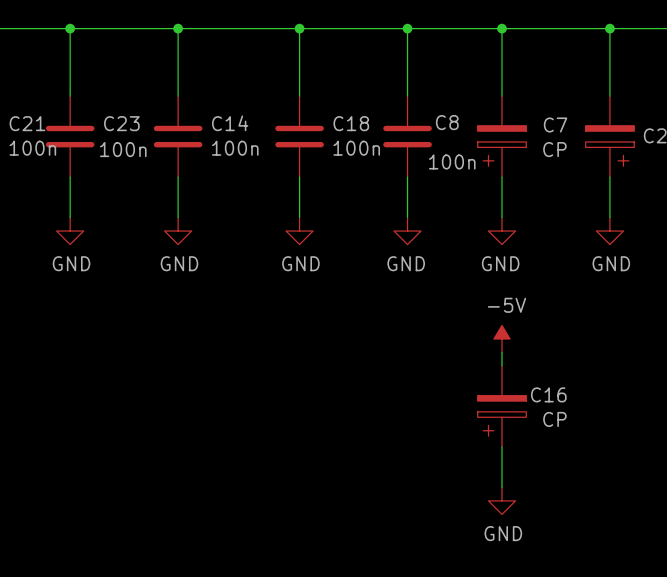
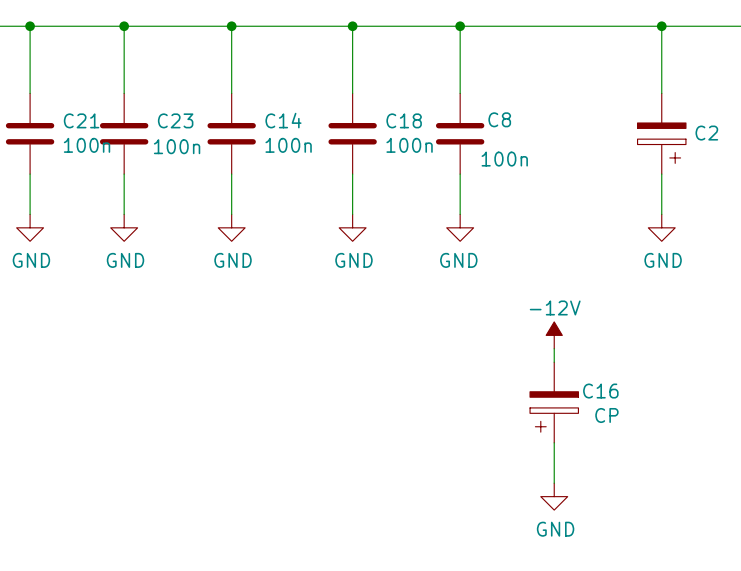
wire: (501, 28) (501, 96) -> none
junction: (501, 28) -> none
C7: CP (501, 136) -> none
wire: (501, 177) (501, 217) -> none
power symbol: GND (501, 231) -> none
power symbol: -5V (501, 338) -> -12V (554, 335)

